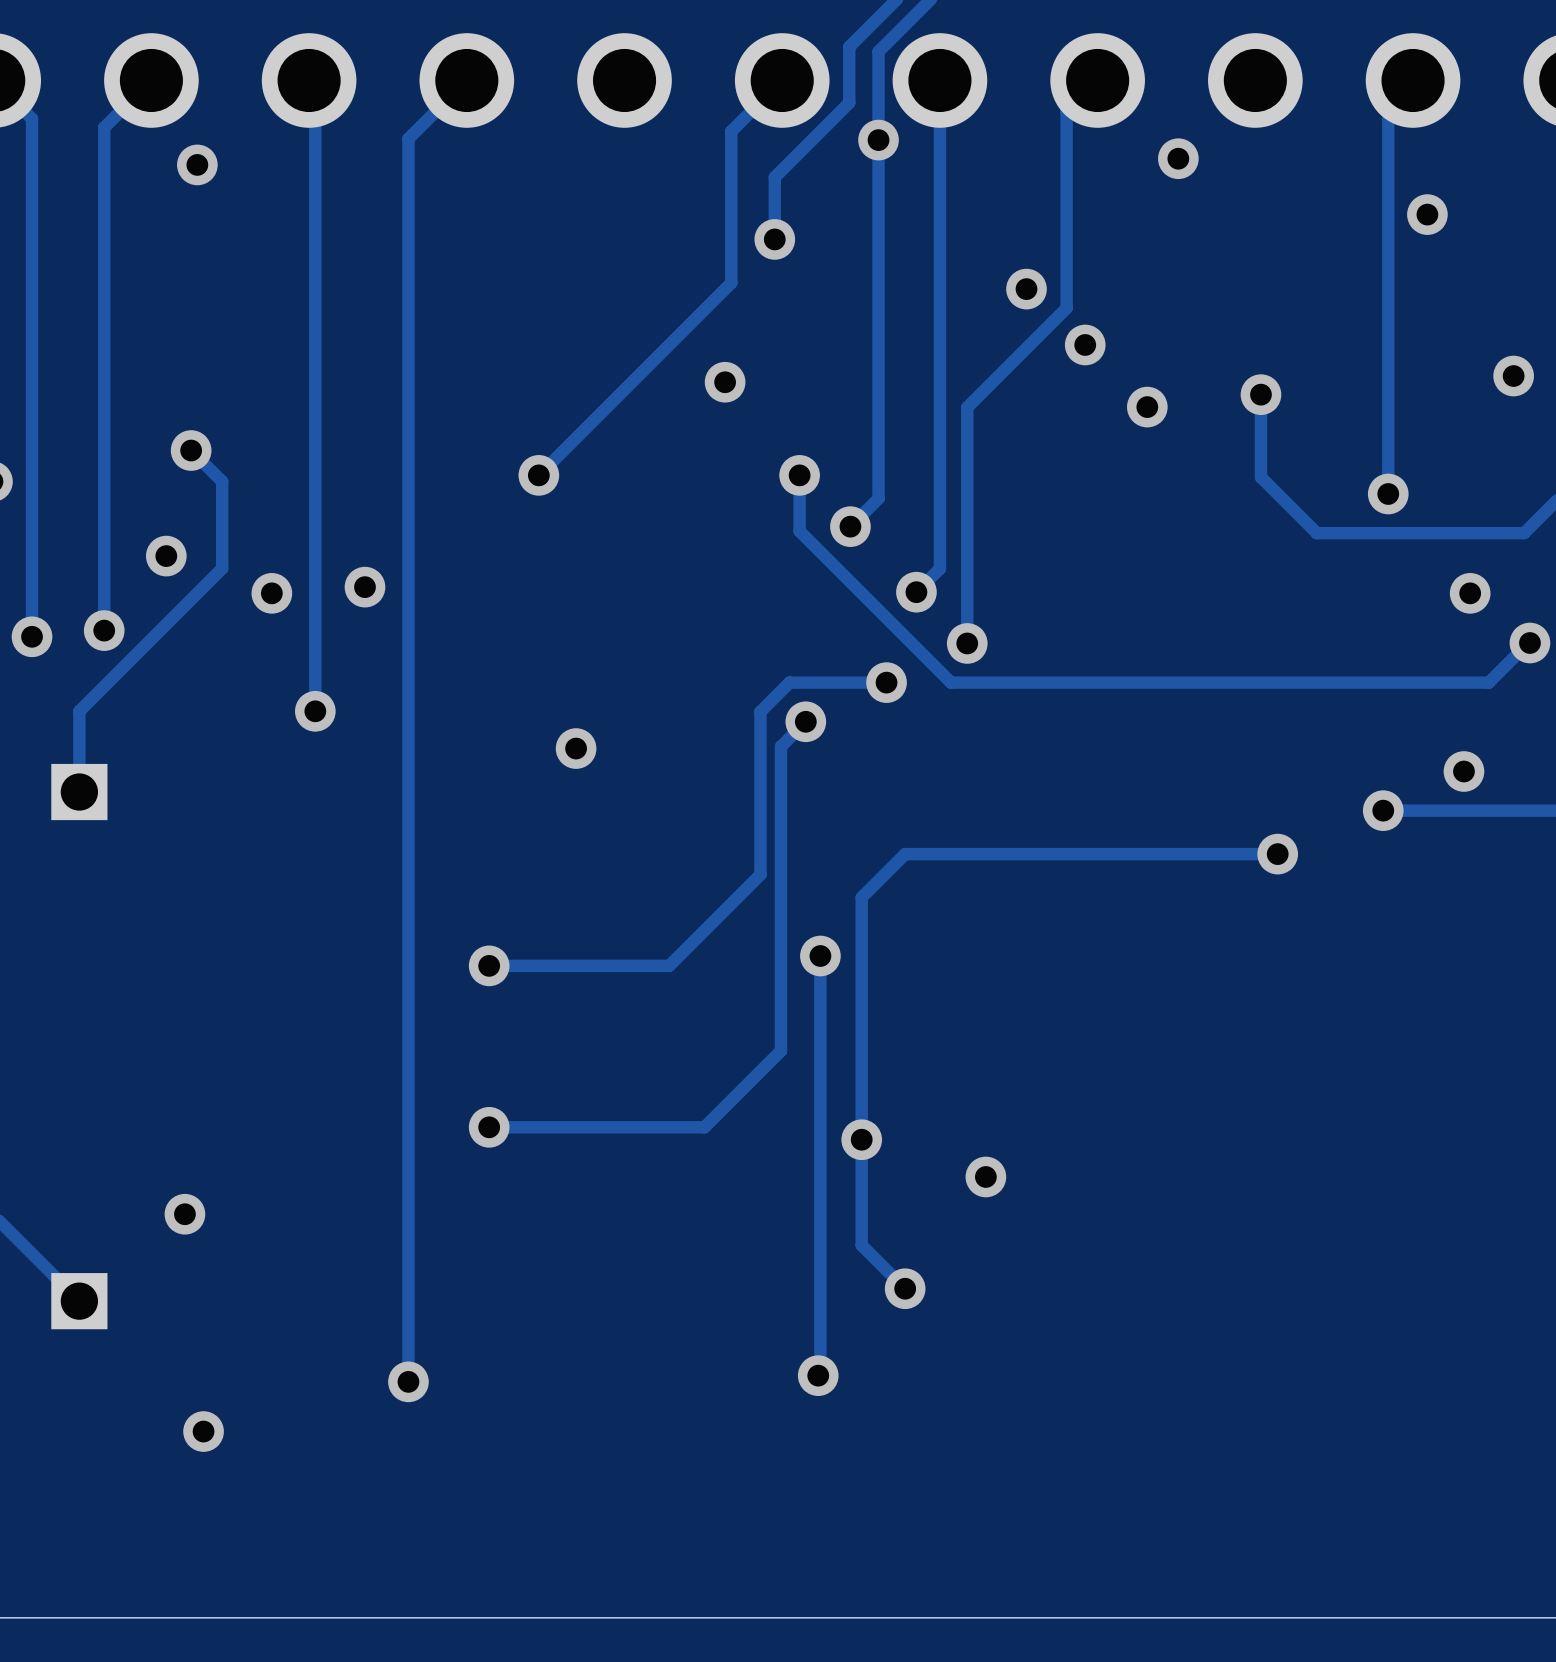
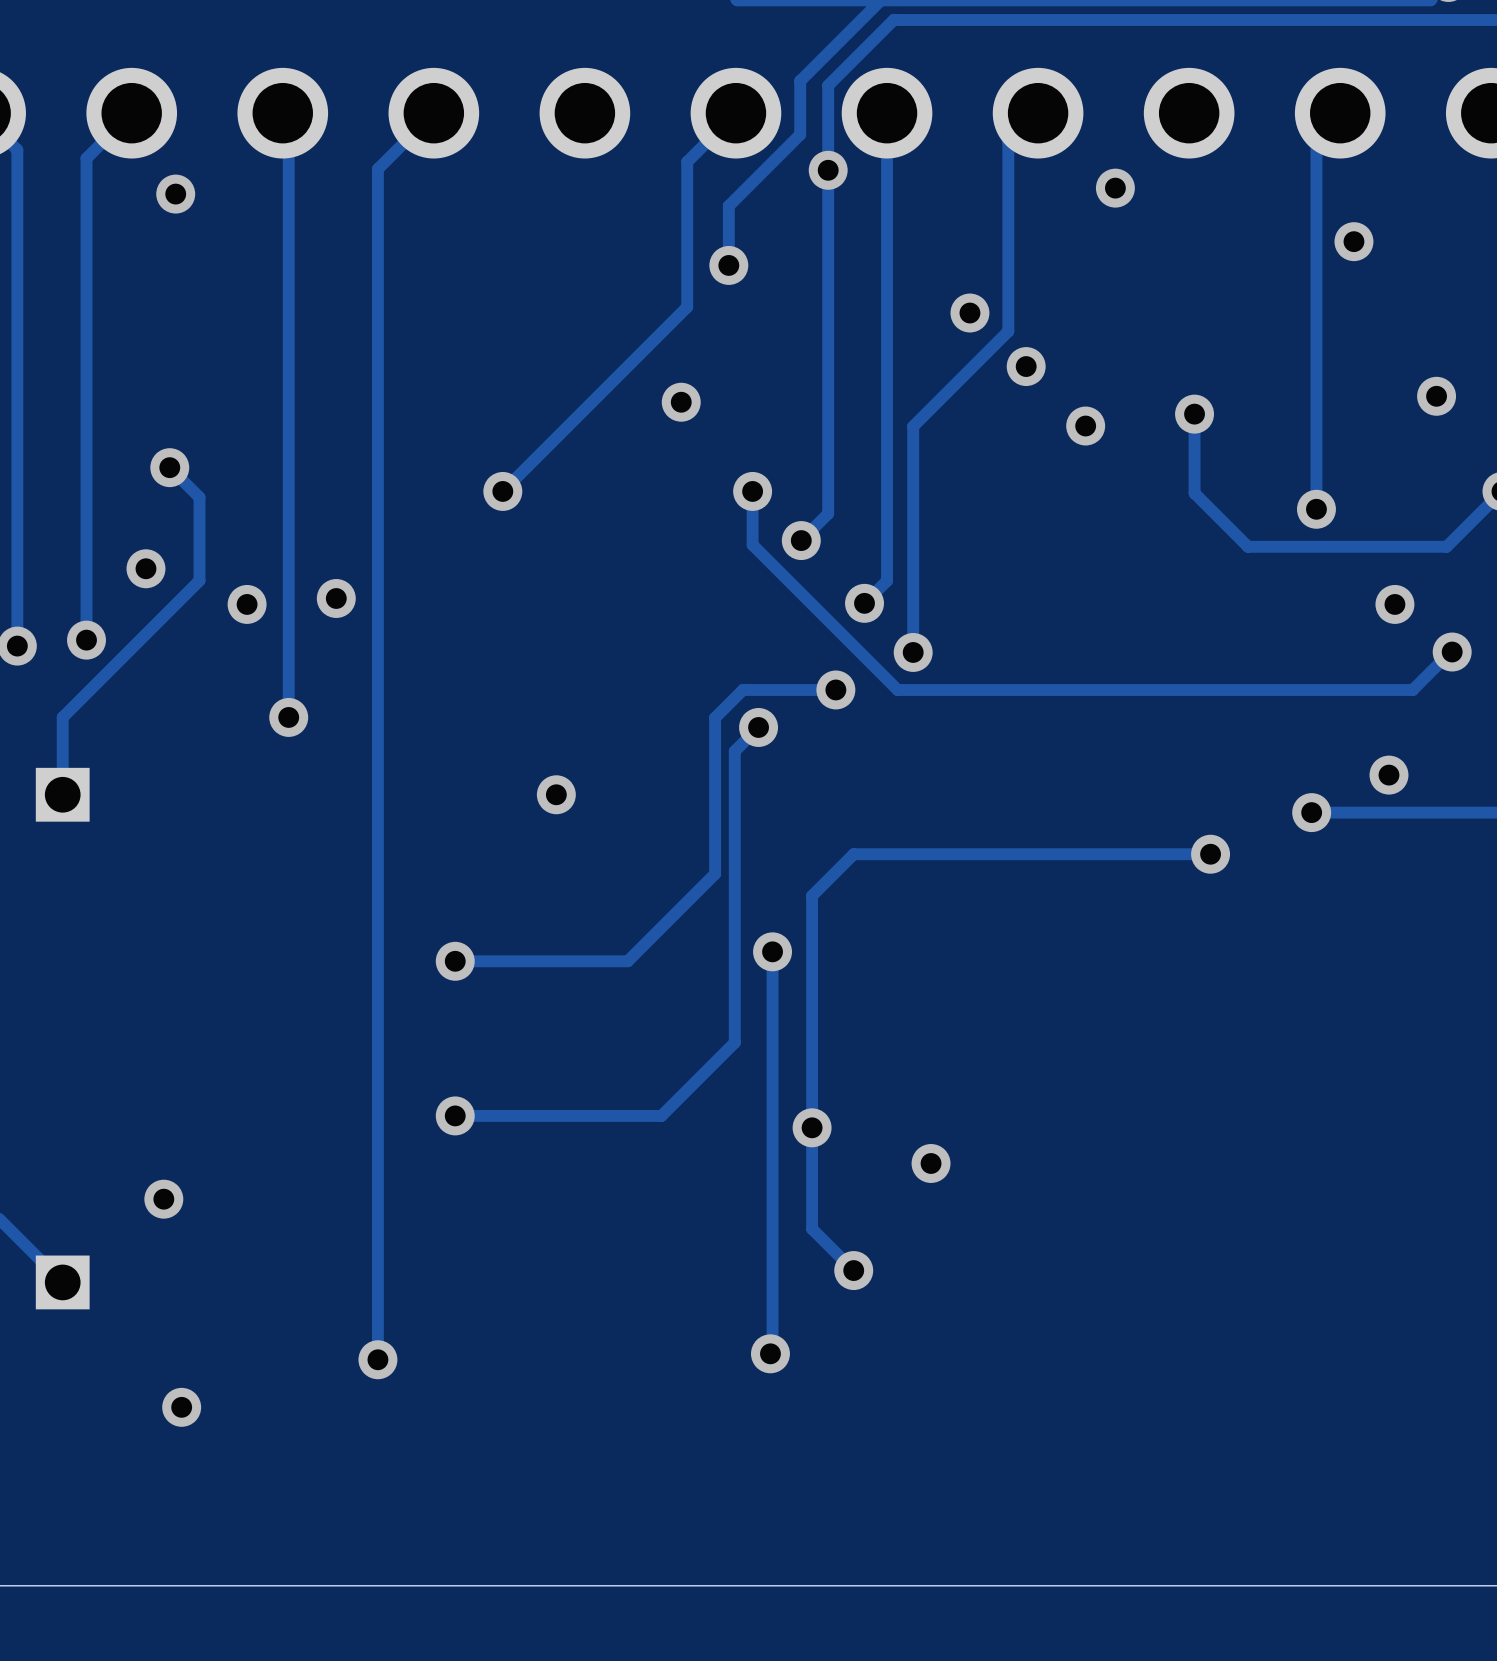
via position: (576, 748) -> (556, 794)

